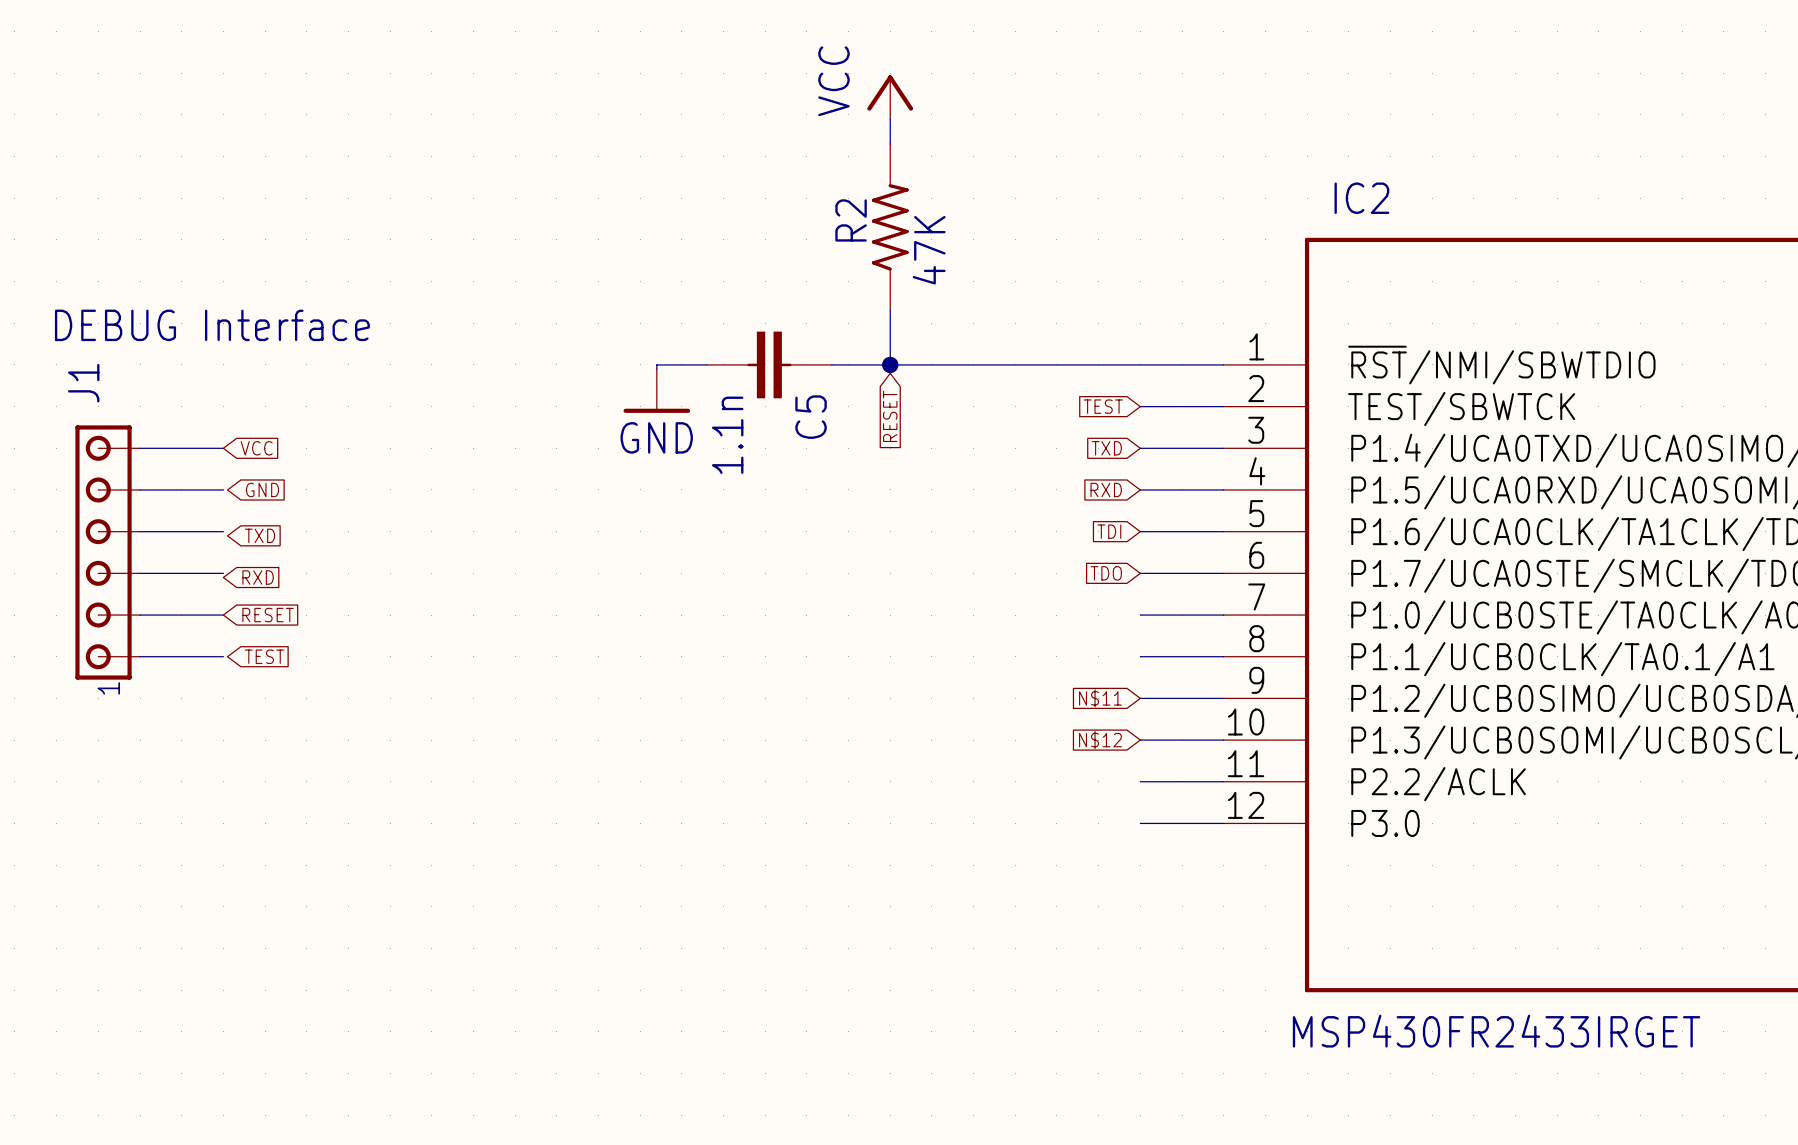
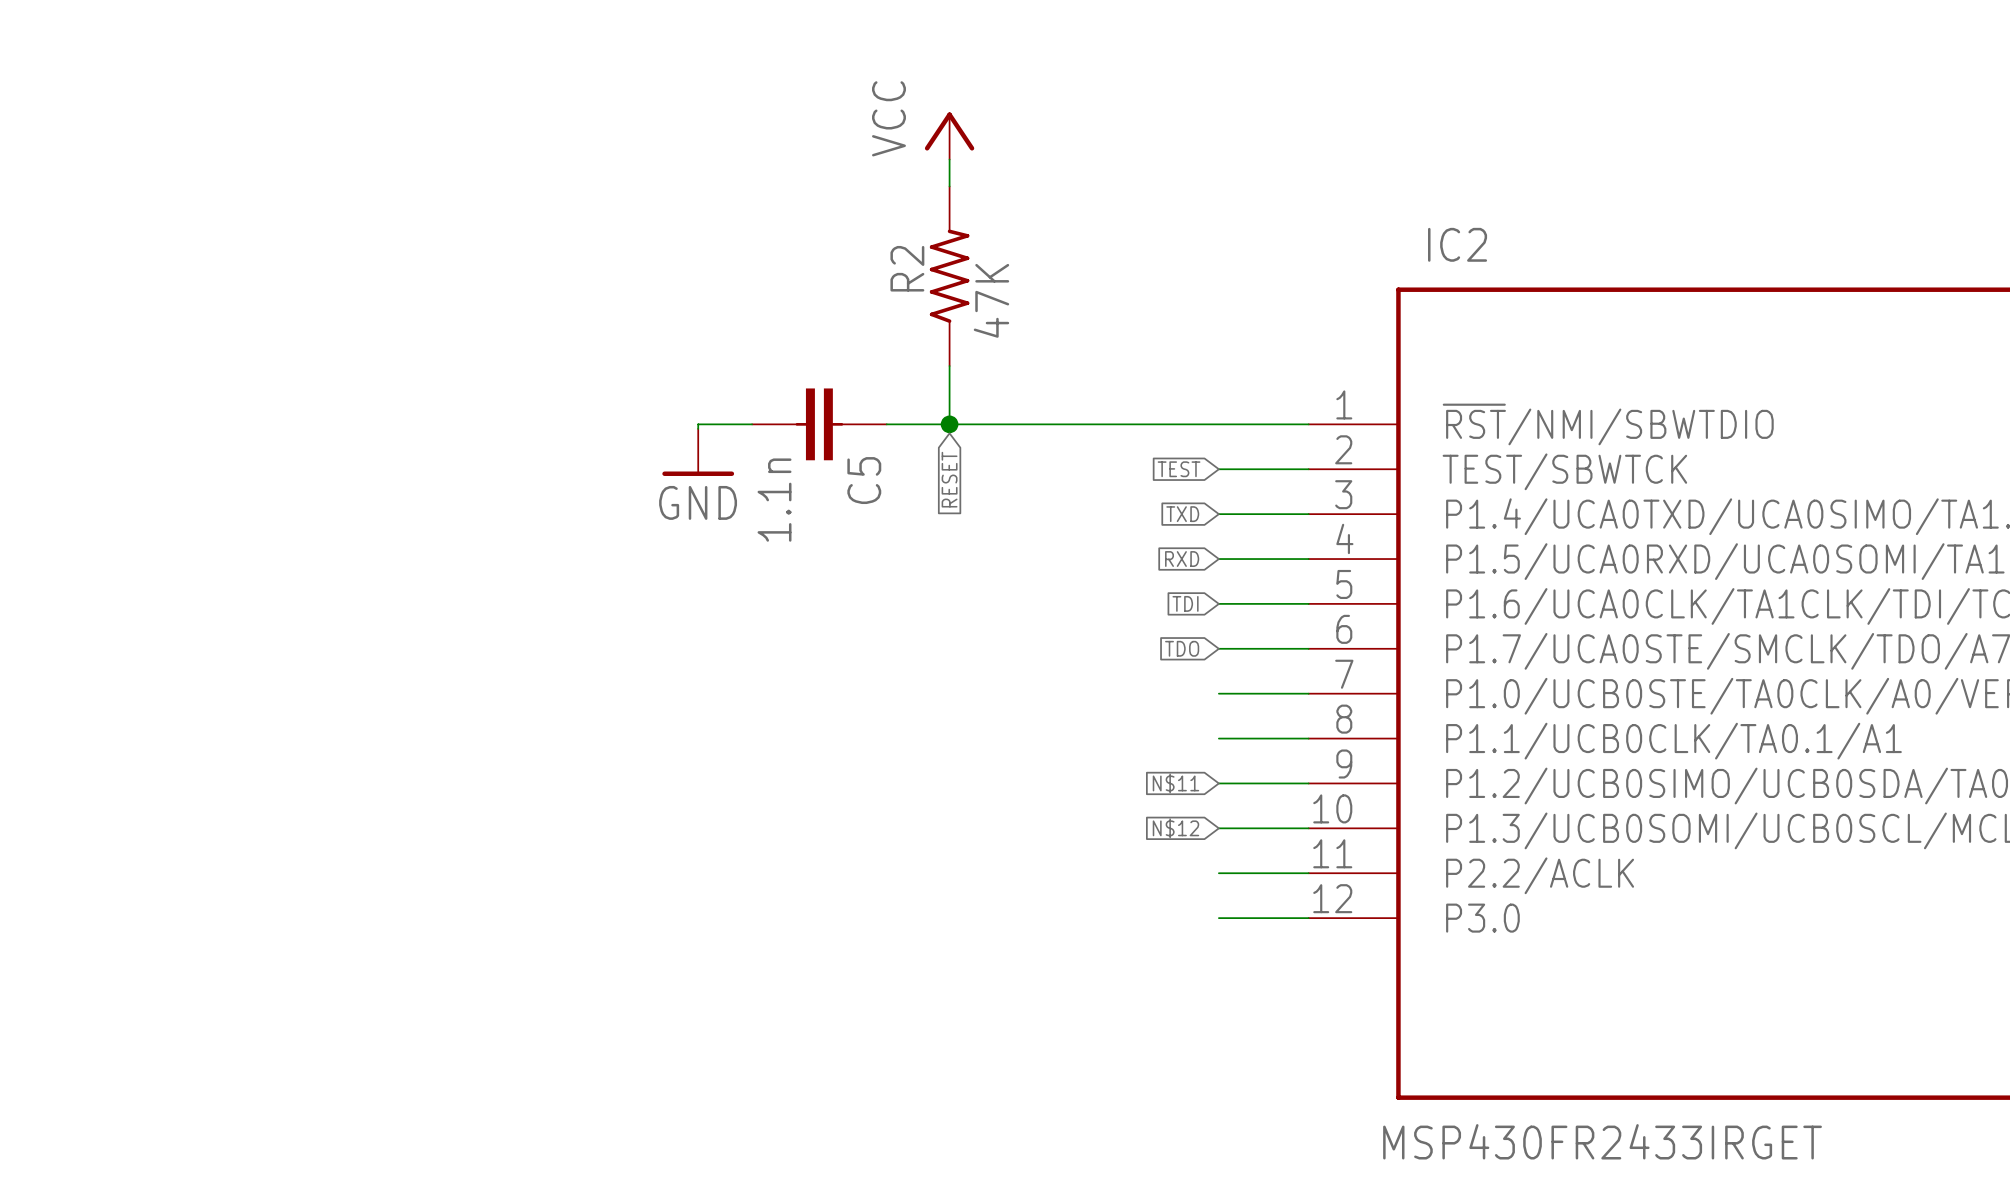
text: DEBUG Interface (212, 325) -> none
wire: (140, 448) (223, 448) -> none
global label: VCC (256, 448) -> none
wire: (140, 489) (223, 489) -> none
global label: GND (262, 489) -> none
wire: (140, 531) (223, 531) -> none
global label: TXD (259, 535) -> none
J1: (107, 552) -> none
wire: (140, 573) (223, 573) -> none
global label: RXD (258, 577) -> none
wire: (140, 615) (223, 615) -> none
global label: RESET (268, 615) -> none
wire: (140, 656) (223, 656) -> none
global label: TEST (264, 656) -> none

